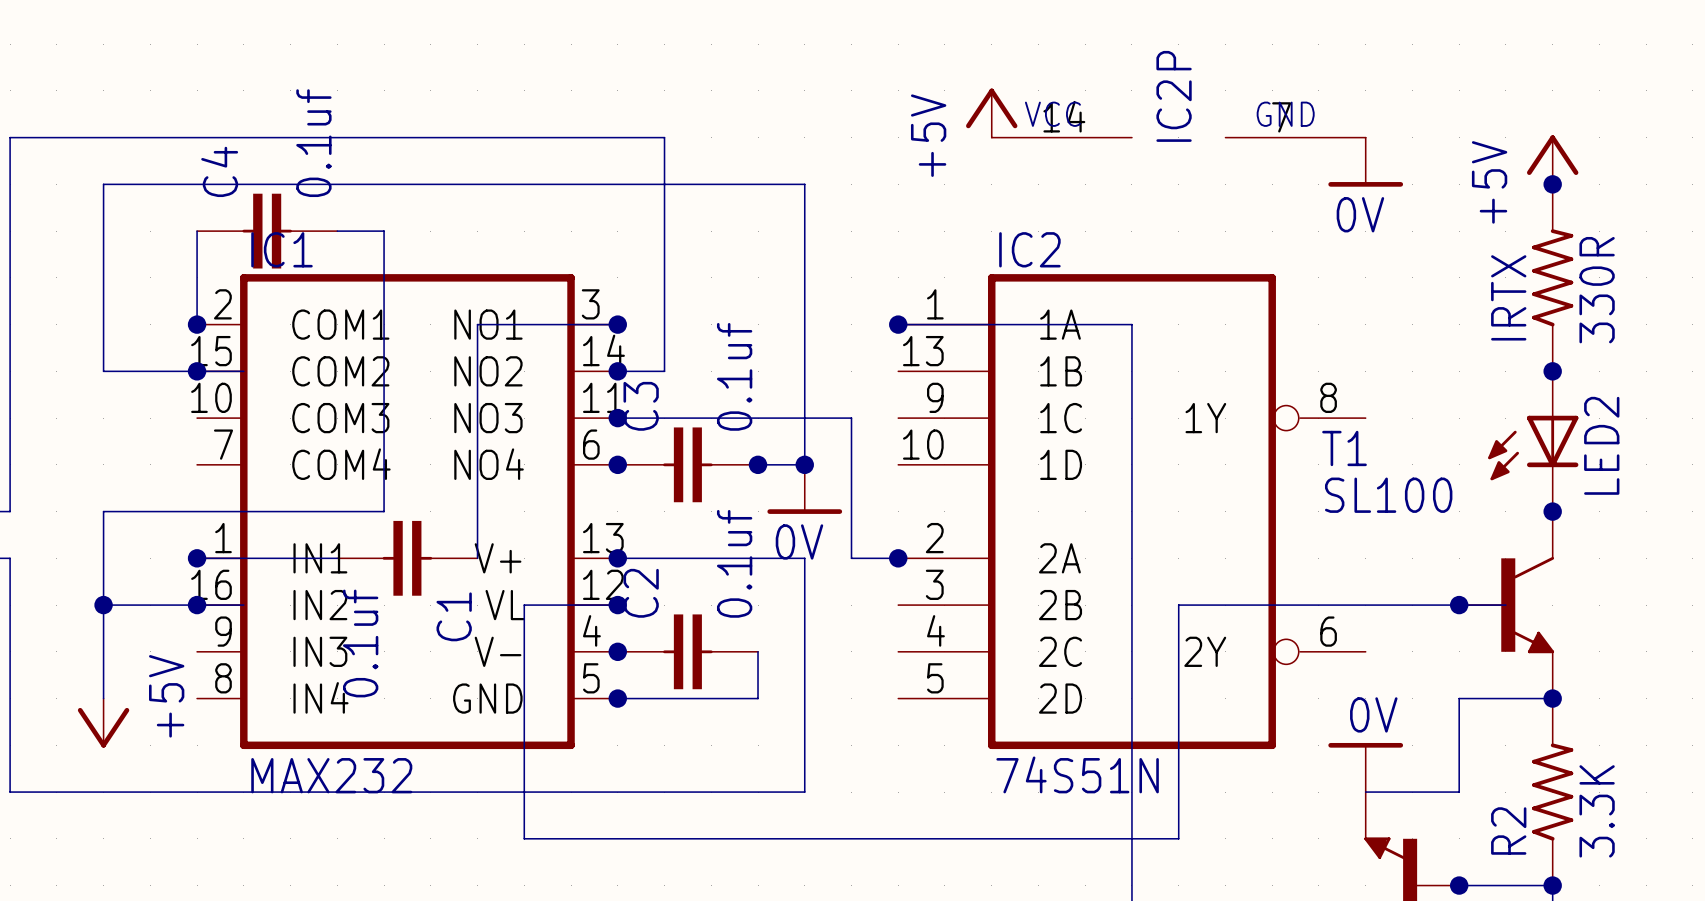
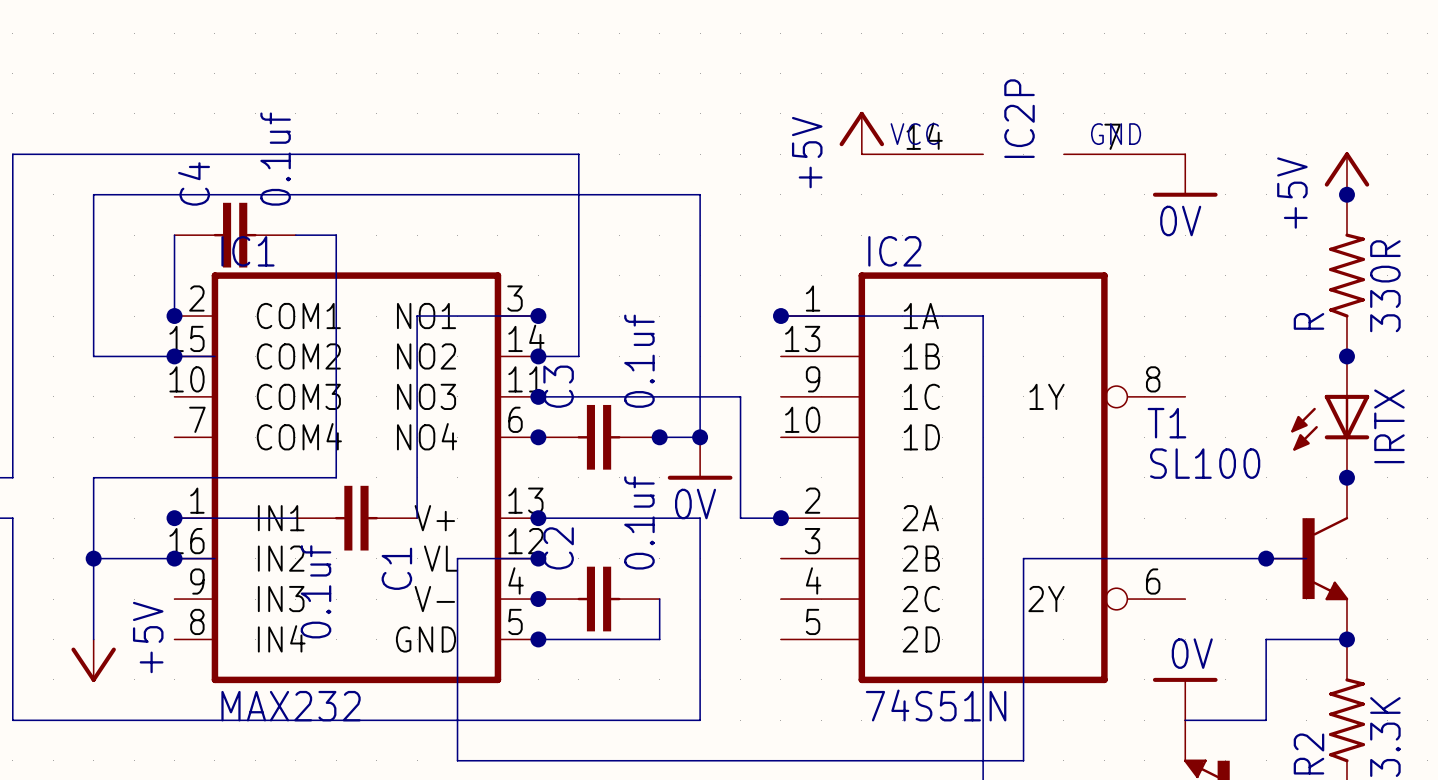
IRTX name: IRTX (1508, 297) -> R (1308, 321)
LED2 name: LED2 (1601, 445) -> IRTX (1389, 426)

